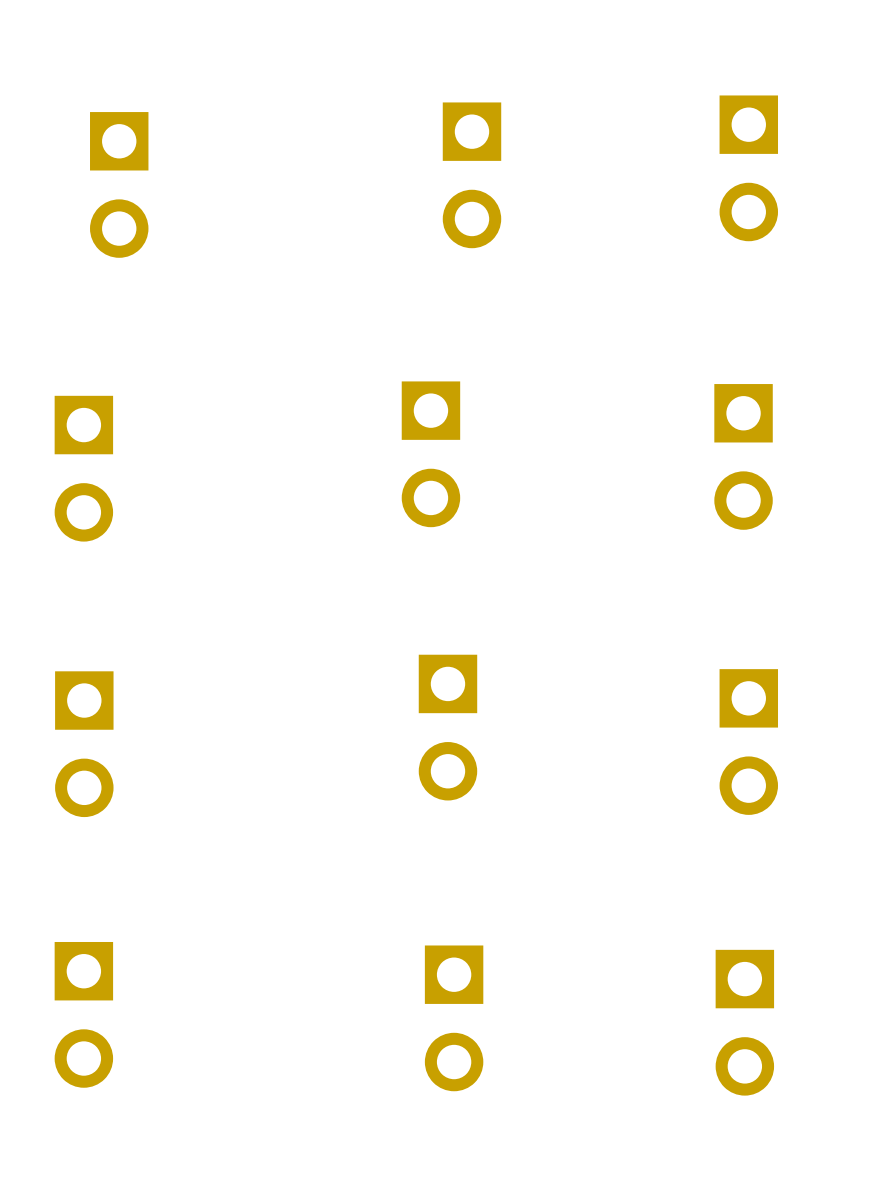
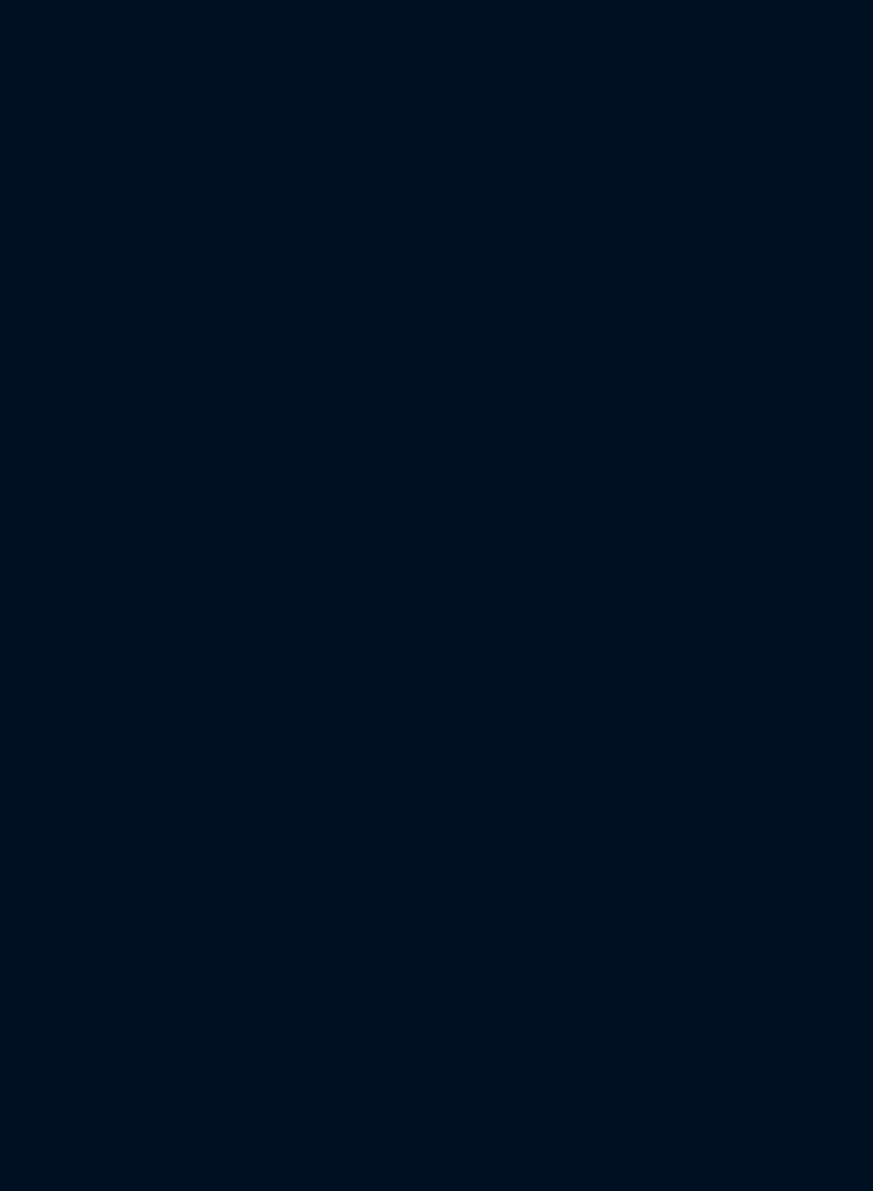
part: (748, 168) -> none
part: (471, 175) -> none
part: (119, 184) -> none
part: (430, 454) -> none
part: (743, 456) -> none
part: (83, 468) -> none
part: (447, 727) -> none
part: (748, 742) -> none
part: (84, 744) -> none
part: (83, 1014) -> none
part: (454, 1018) -> none
part: (744, 1022) -> none

